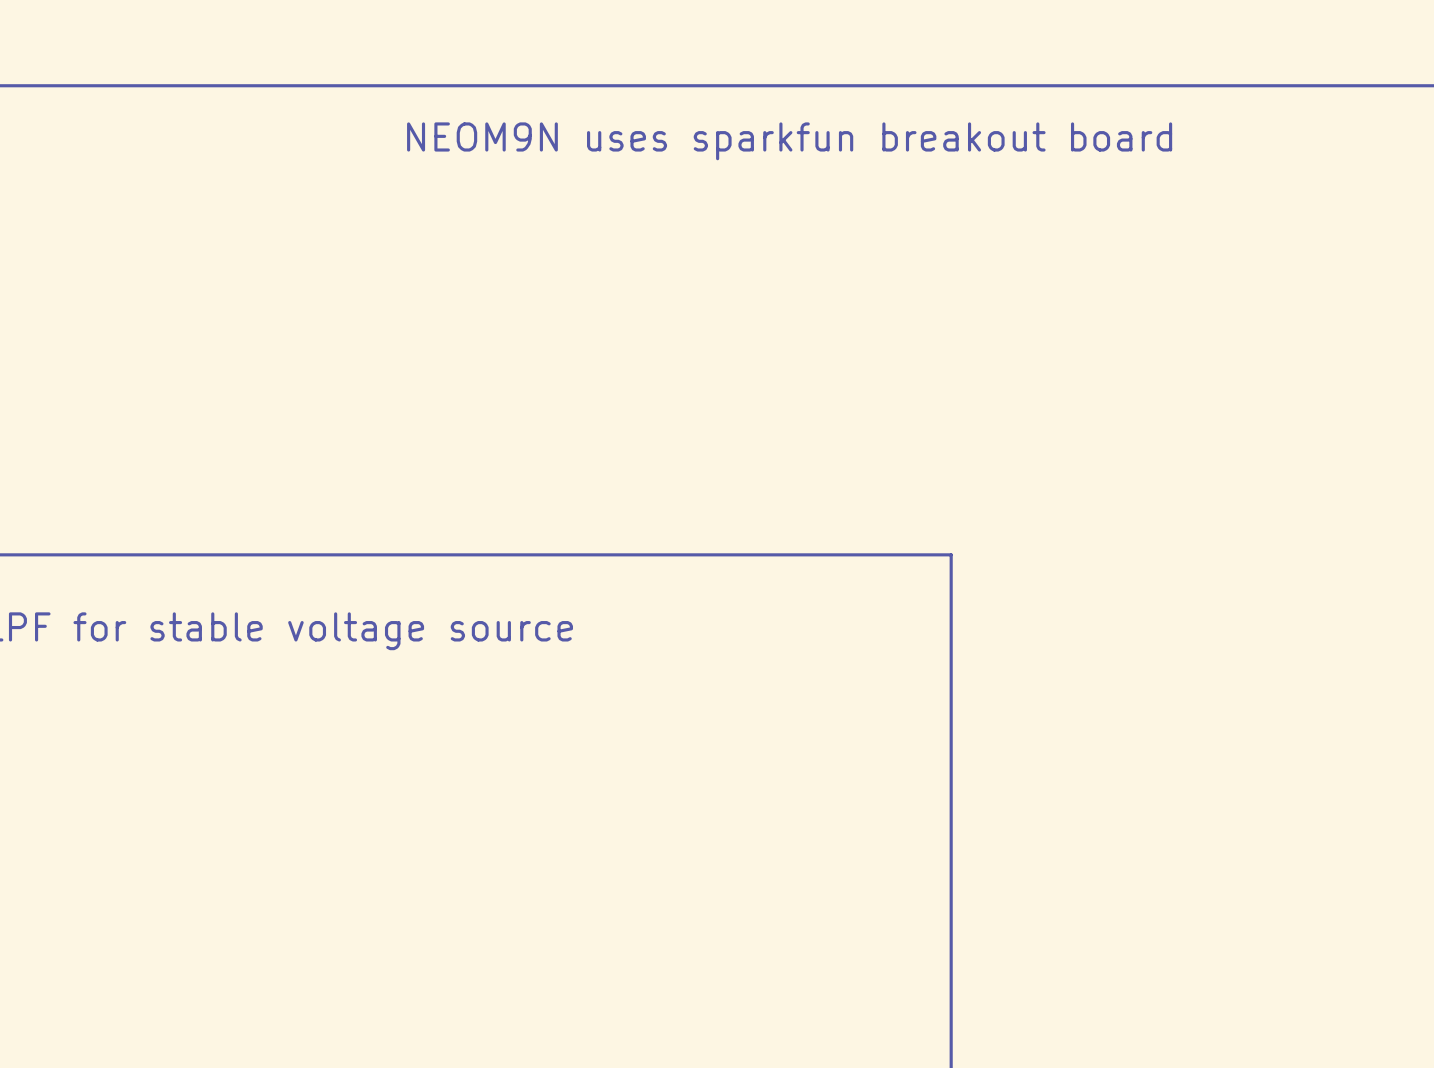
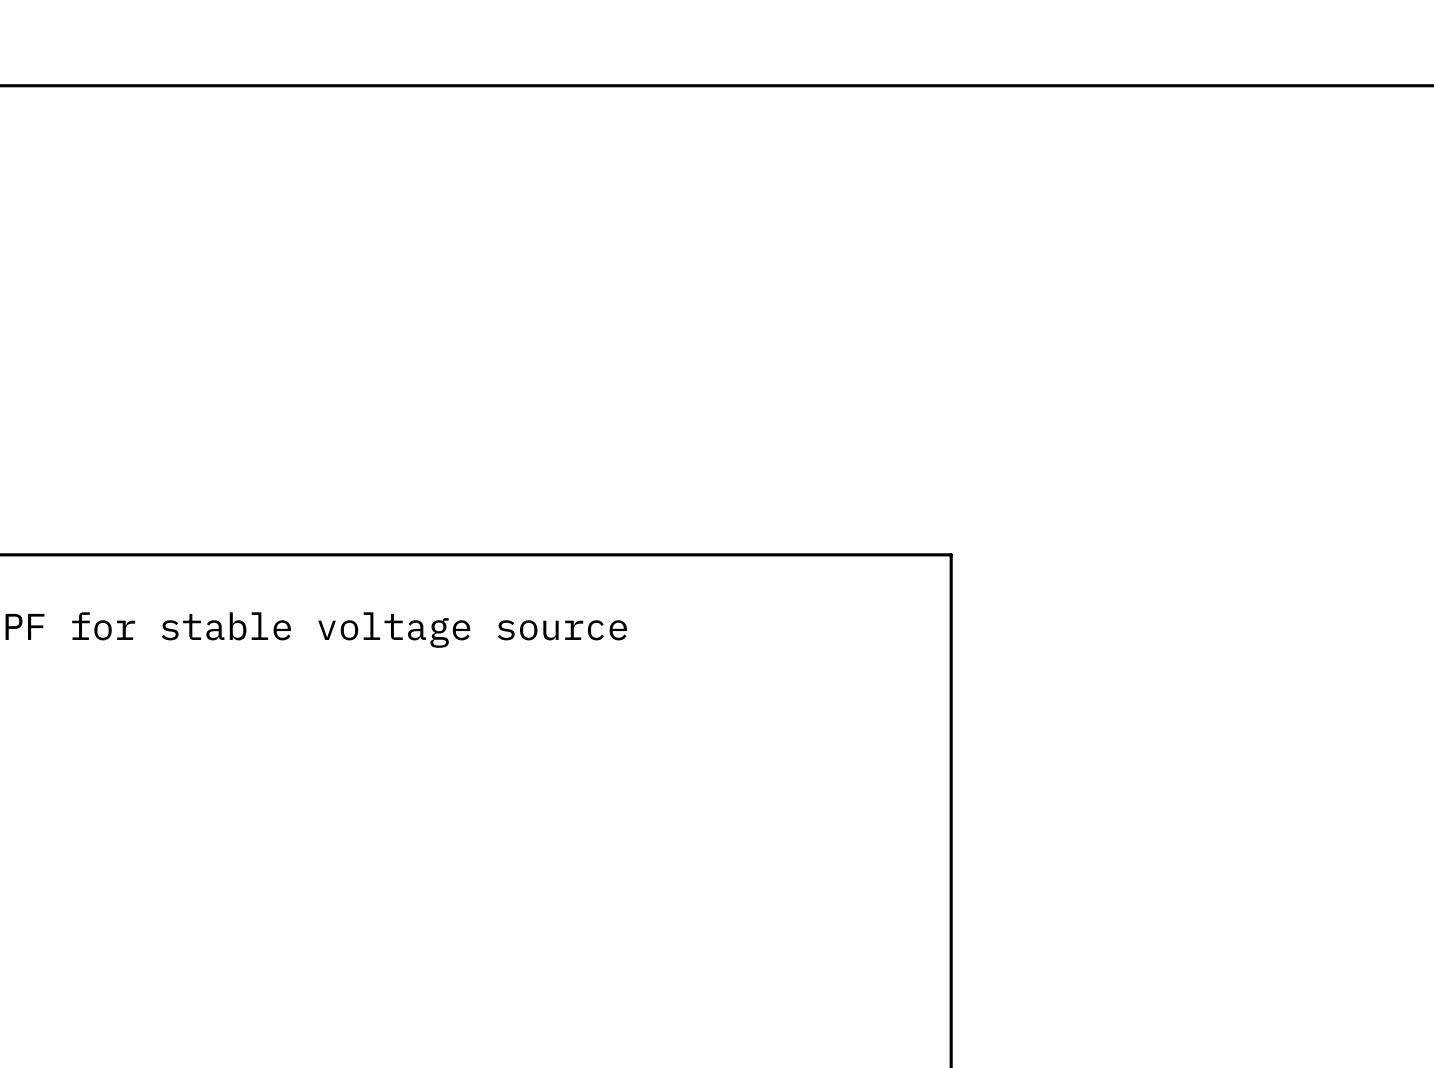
text: NEOM9N uses sparkfun breakout board (789, 141) -> none

